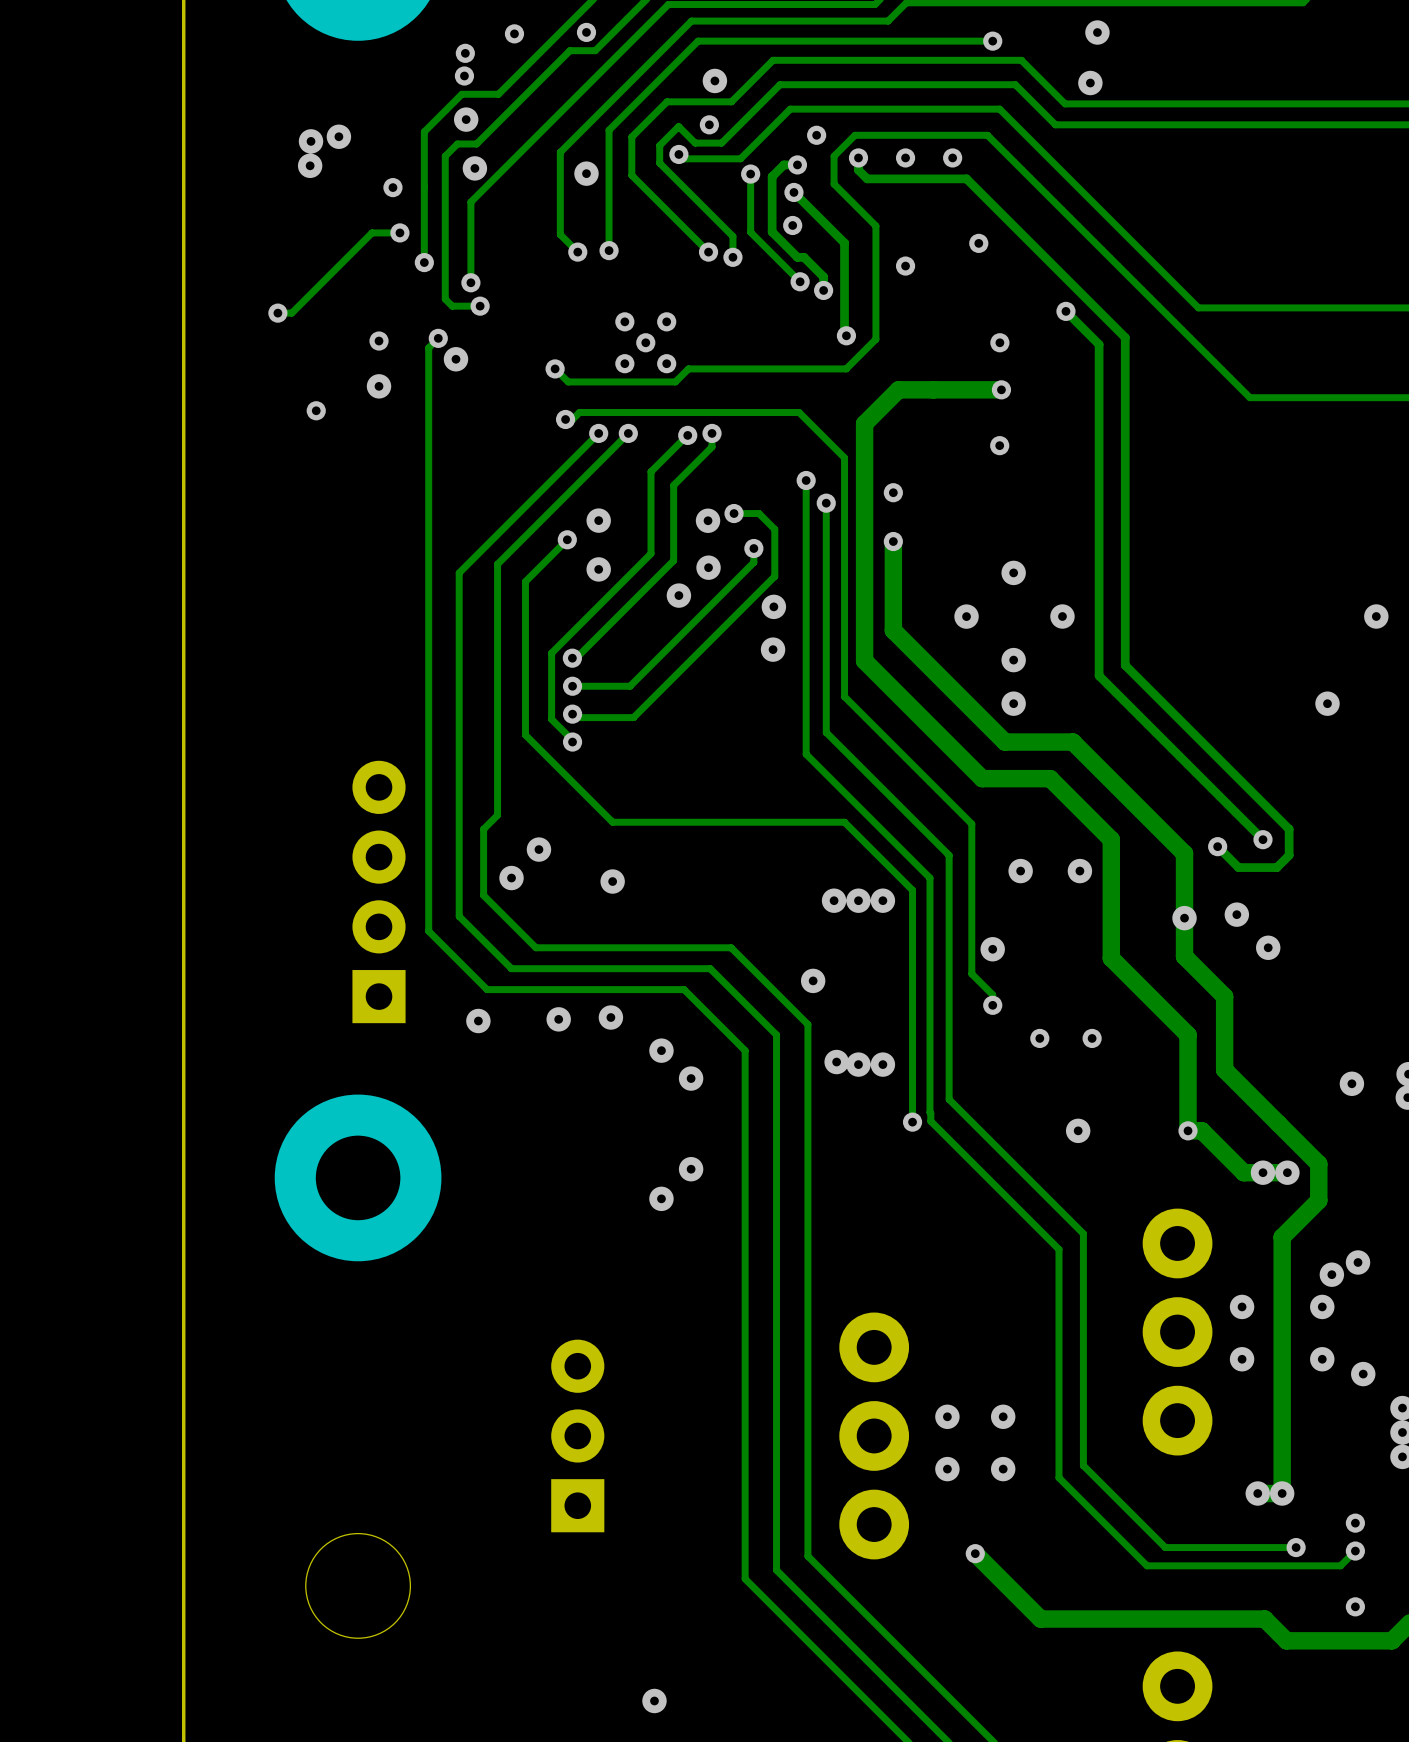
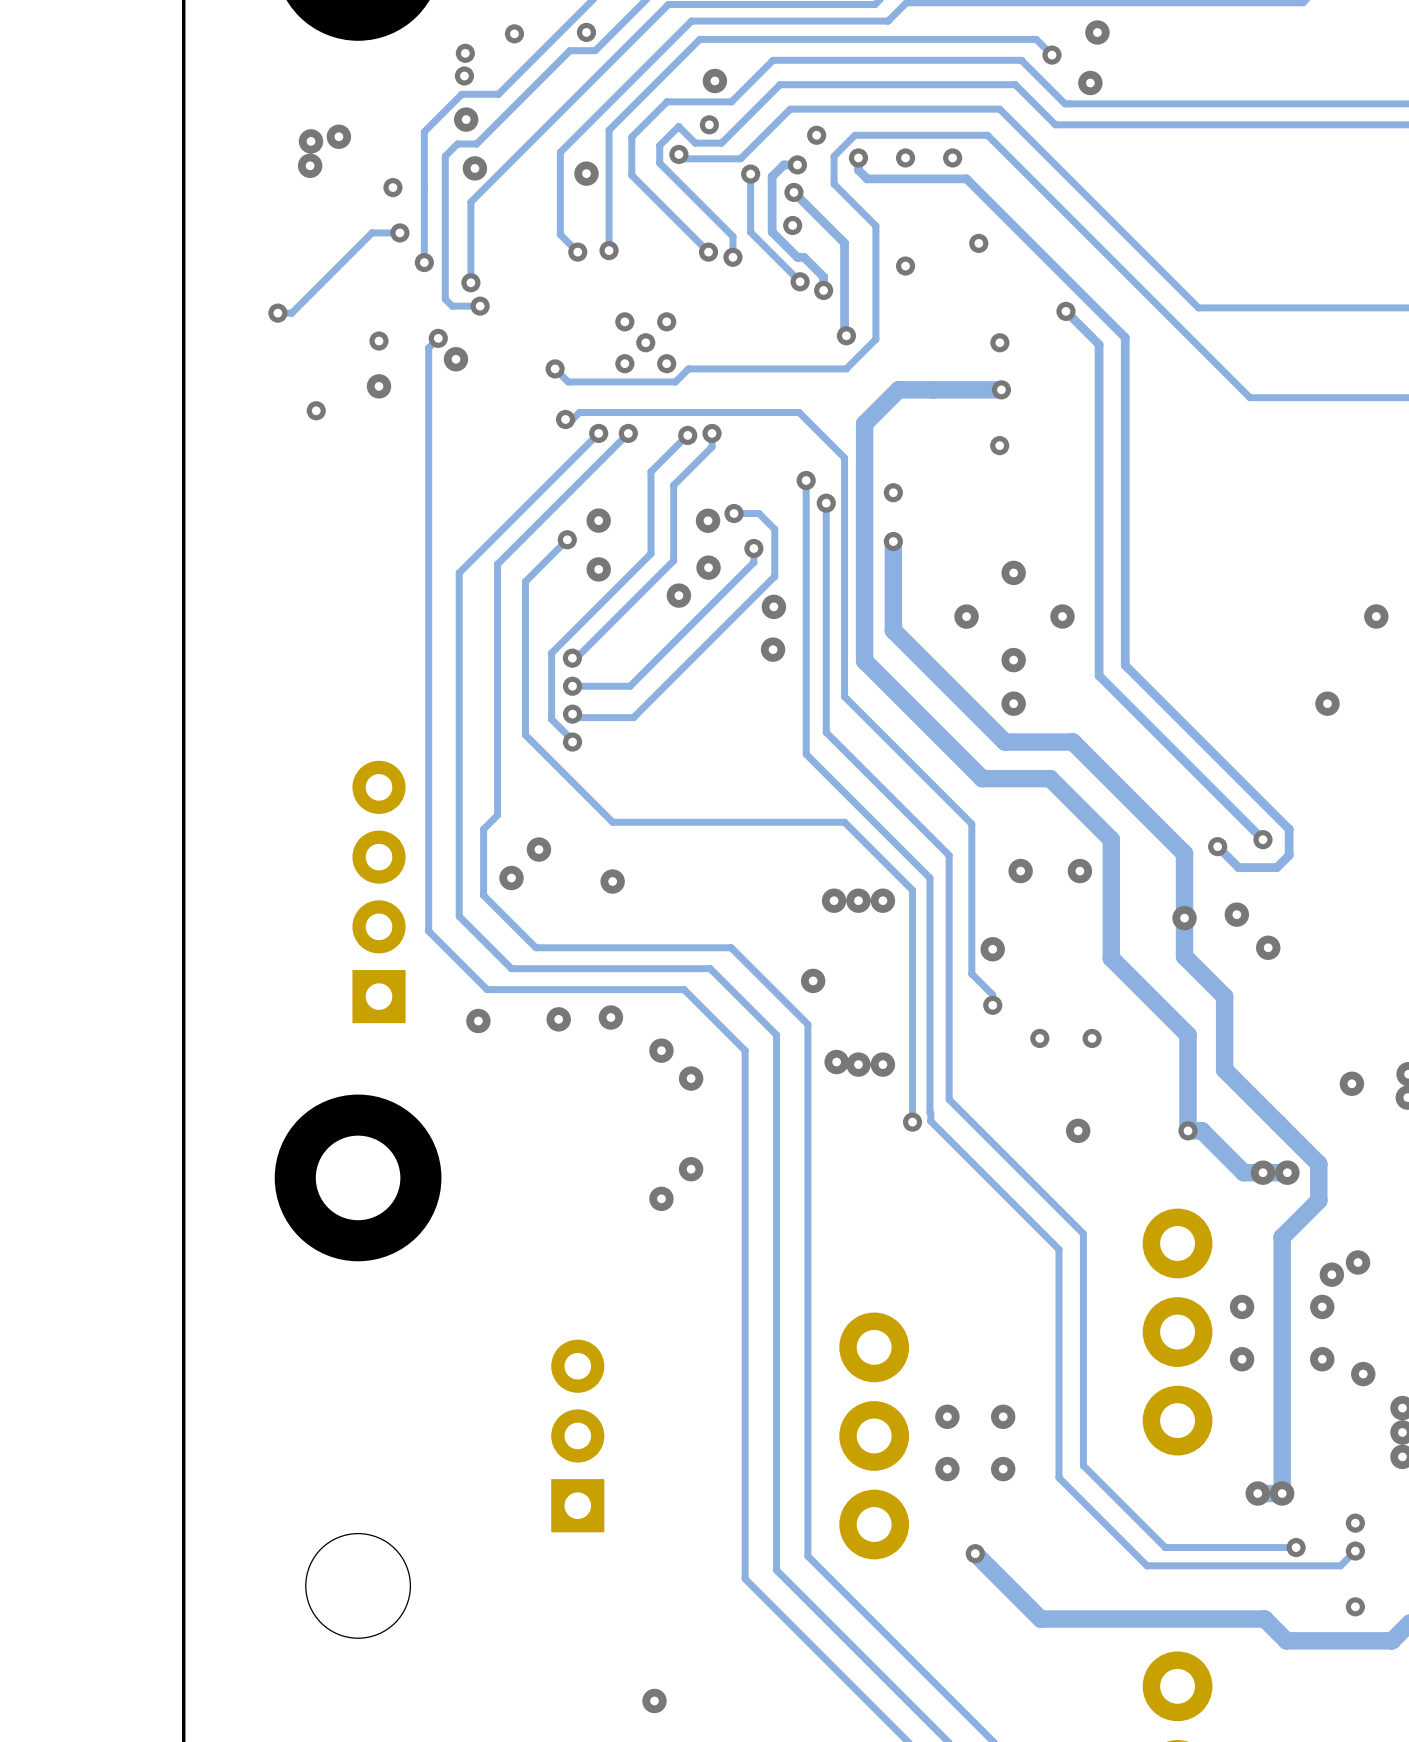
track: (992, 41) (698, 41) -> (1052, 55) (1036, 39) (699, 39) (698, 41)
via position: (992, 41) -> (1052, 55)

